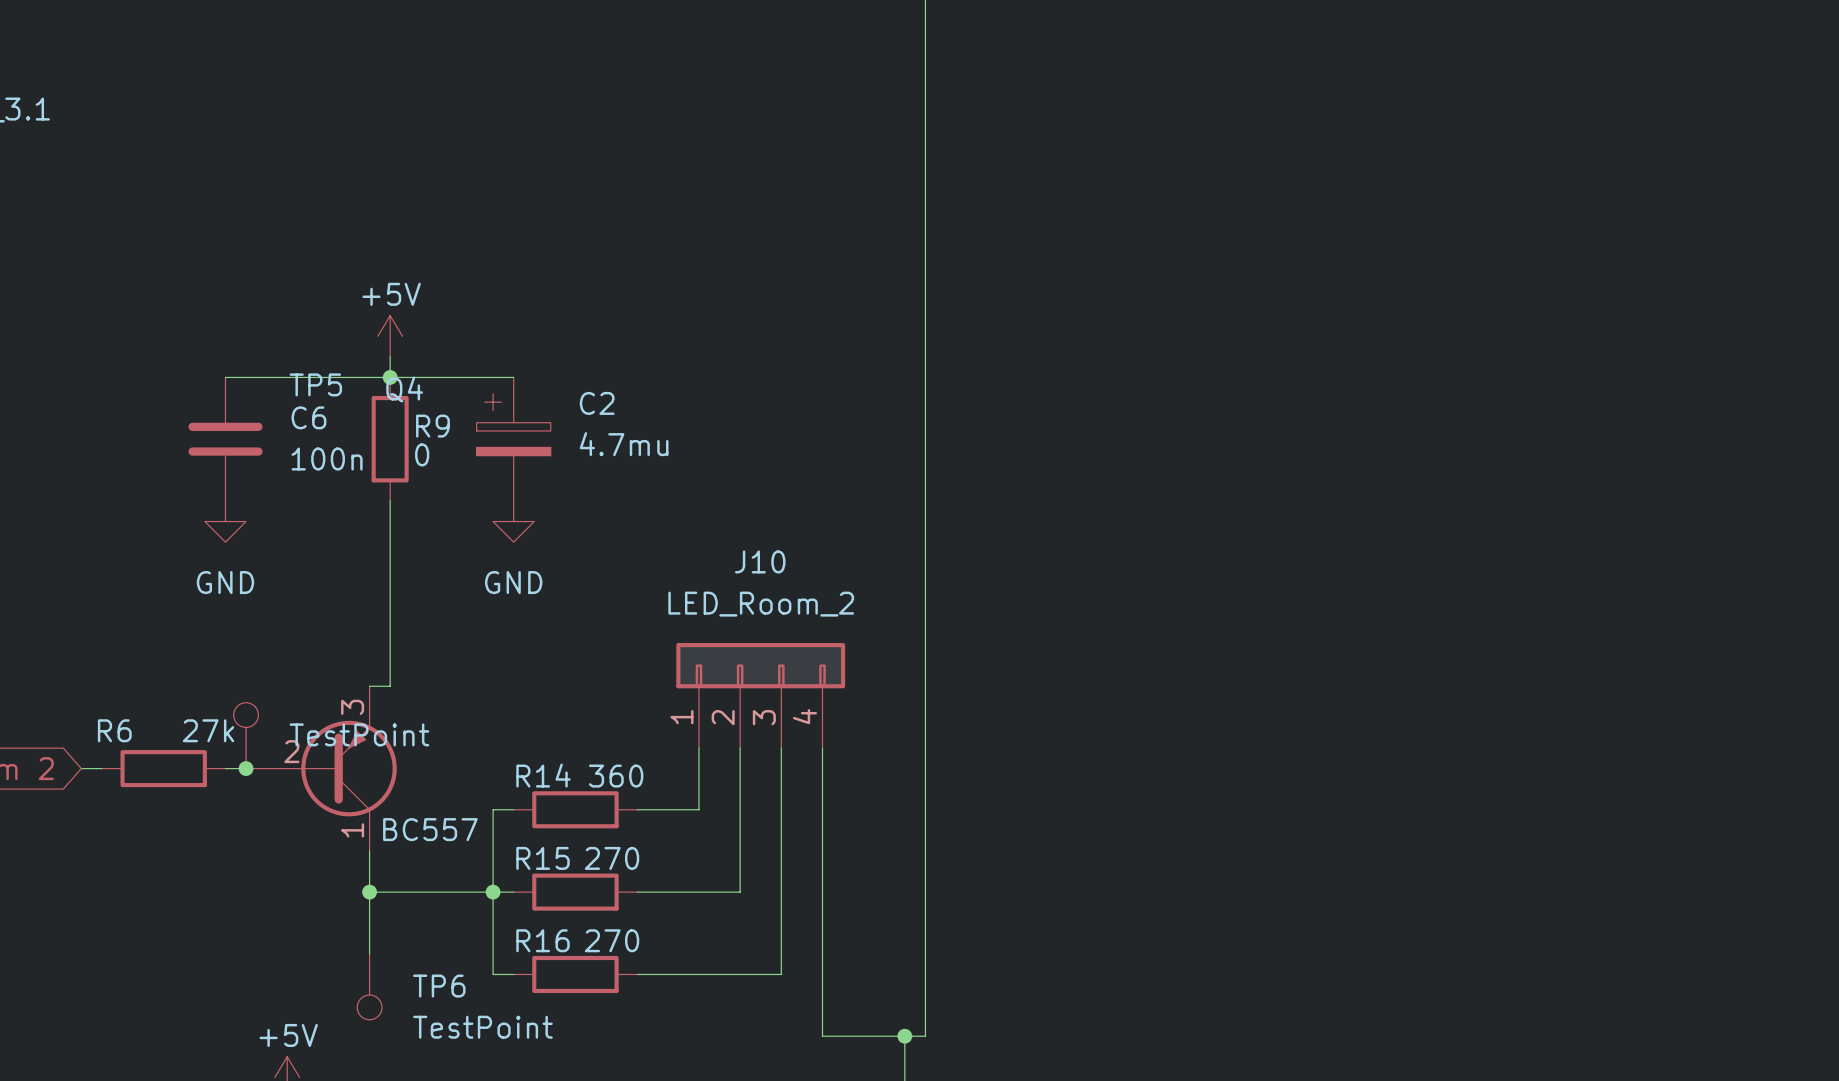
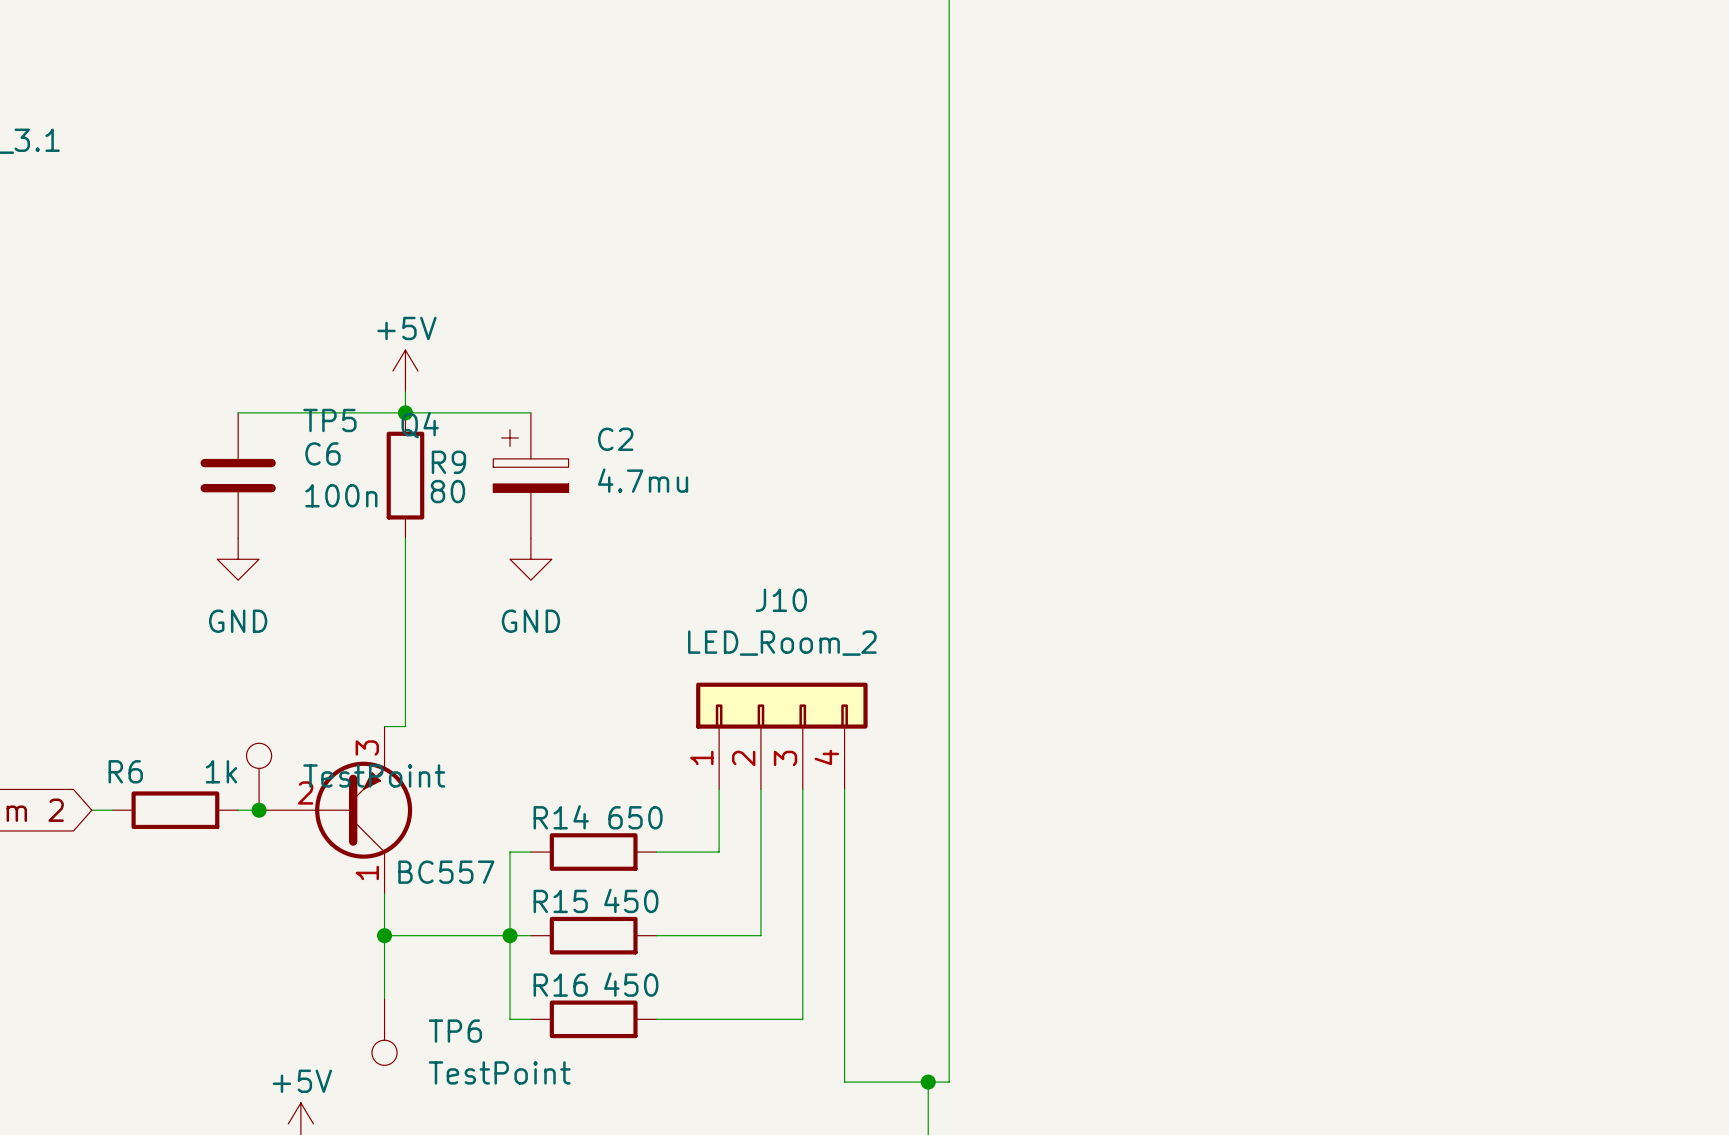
R9 value: 0 (422, 454) -> 80 (447, 491)
R6 value: 27k (208, 730) -> 1k (221, 771)
R14 value: 360 (616, 776) -> 650 (635, 817)
R15 value: 270 (612, 858) -> 450 (631, 900)
R16 value: 270 (612, 940) -> 450 (631, 984)

